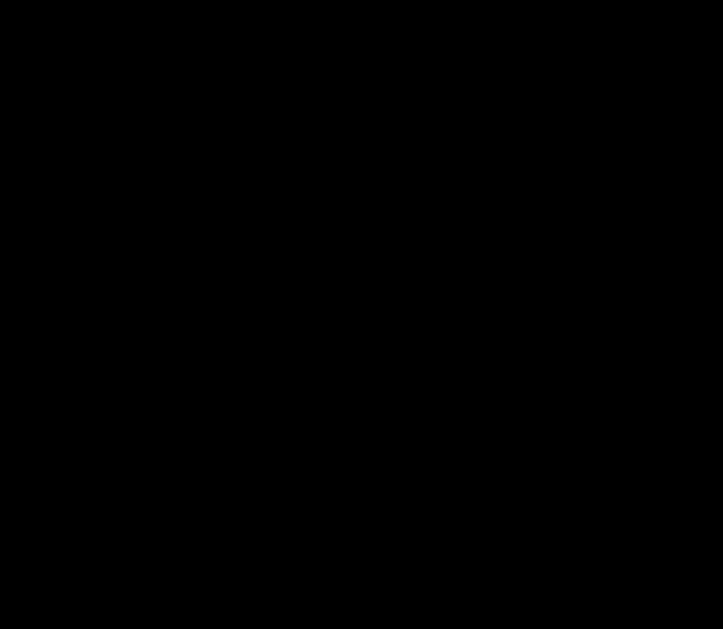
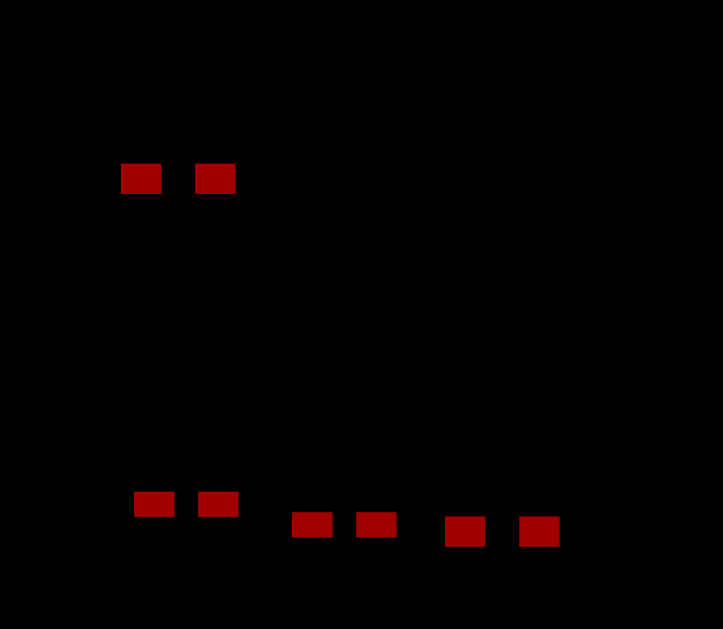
part: none -> (178, 178)
part: none -> (186, 504)
part: none -> (344, 524)
part: none -> (502, 531)

